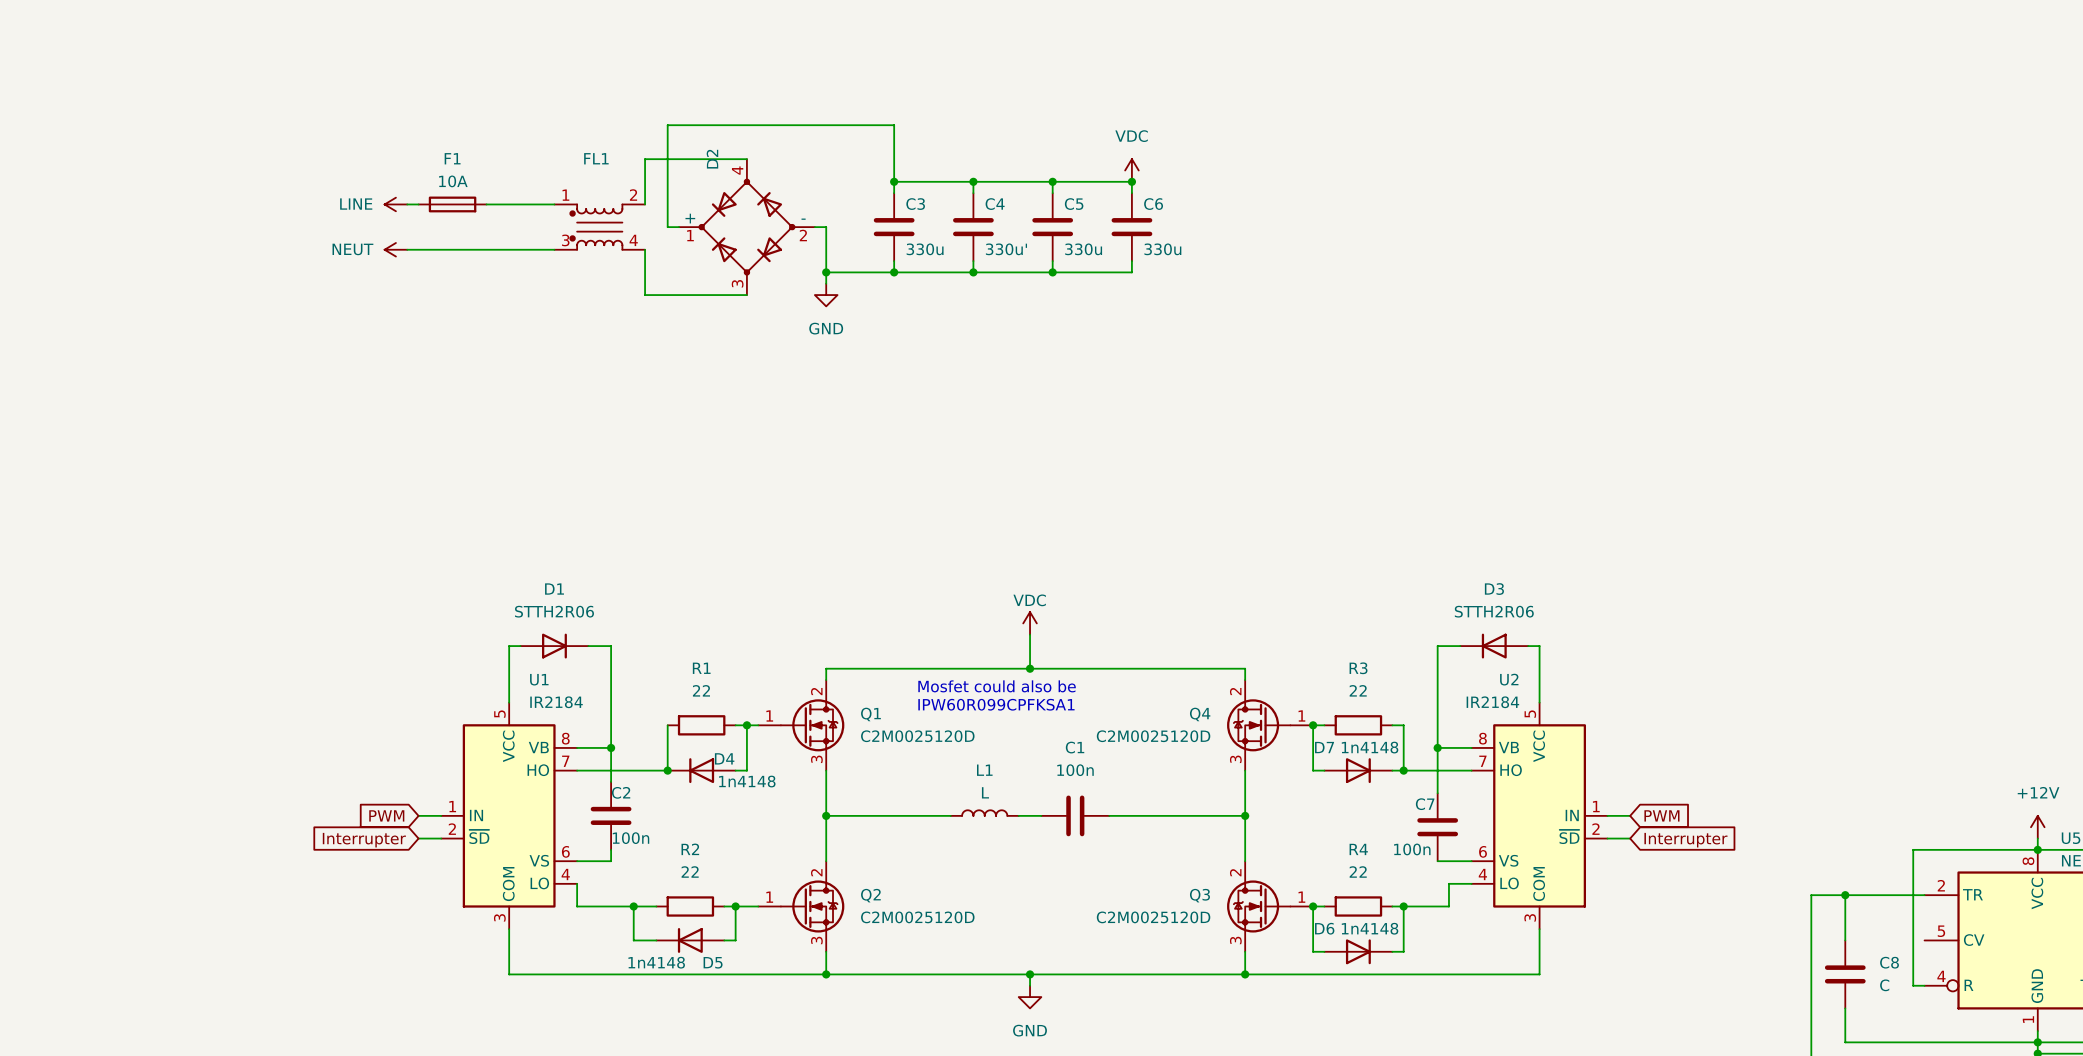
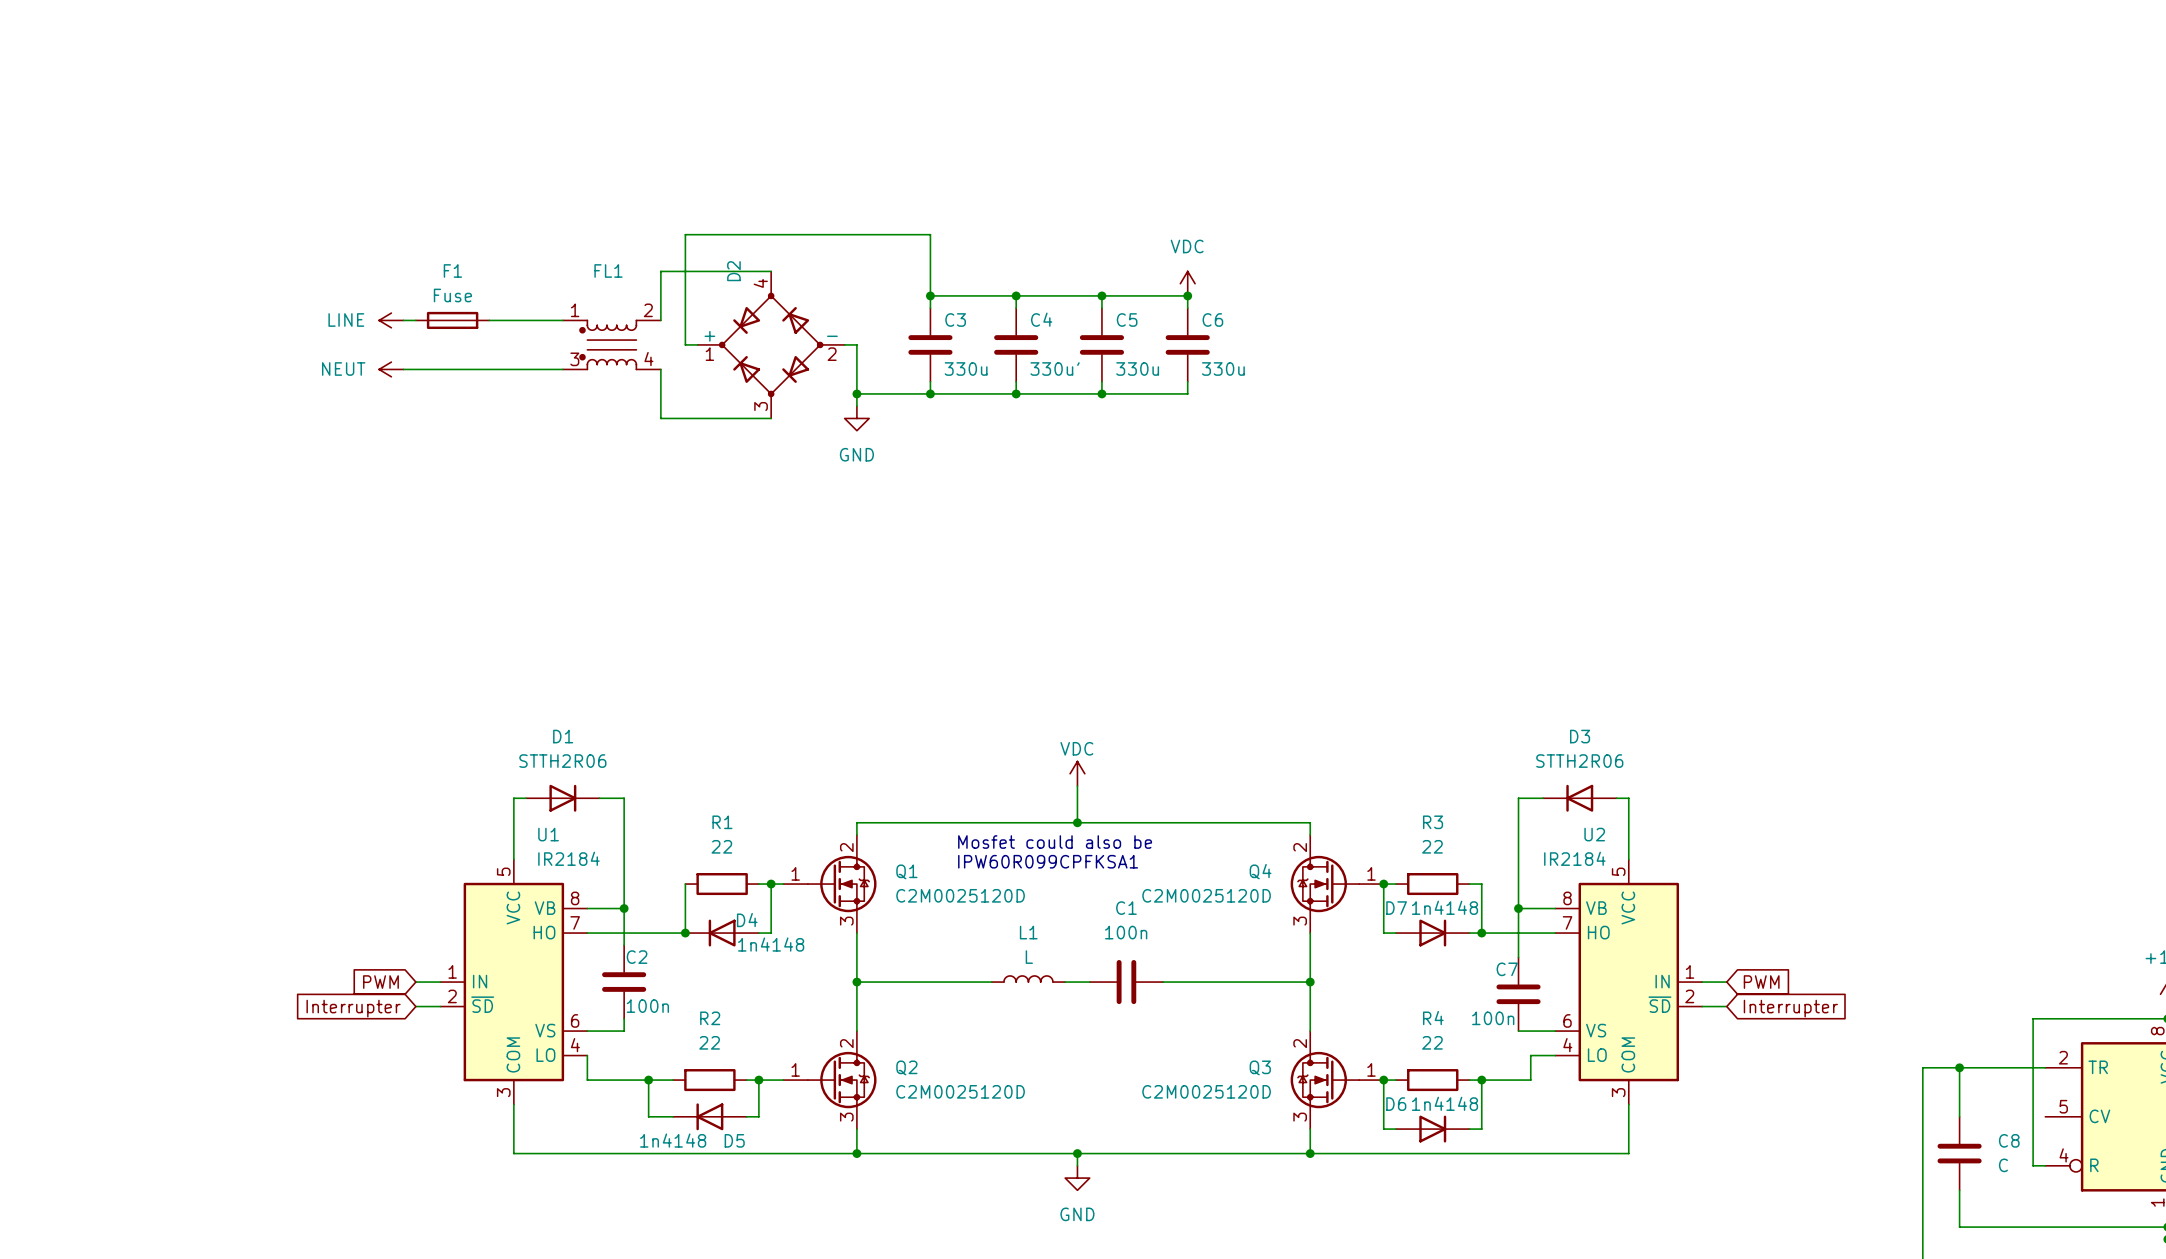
F1 value: 10A (453, 181) -> Fuse (452, 295)

